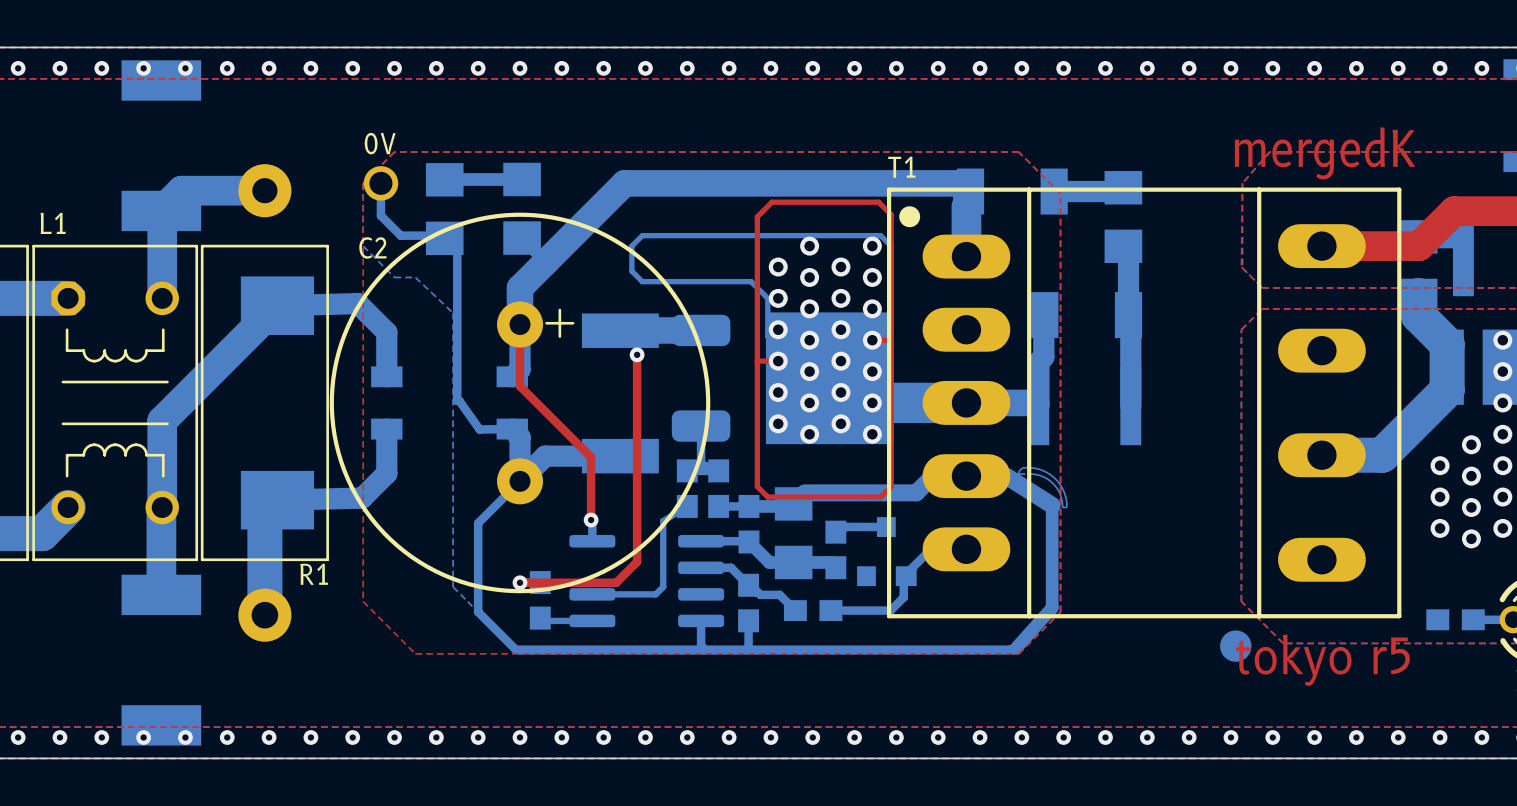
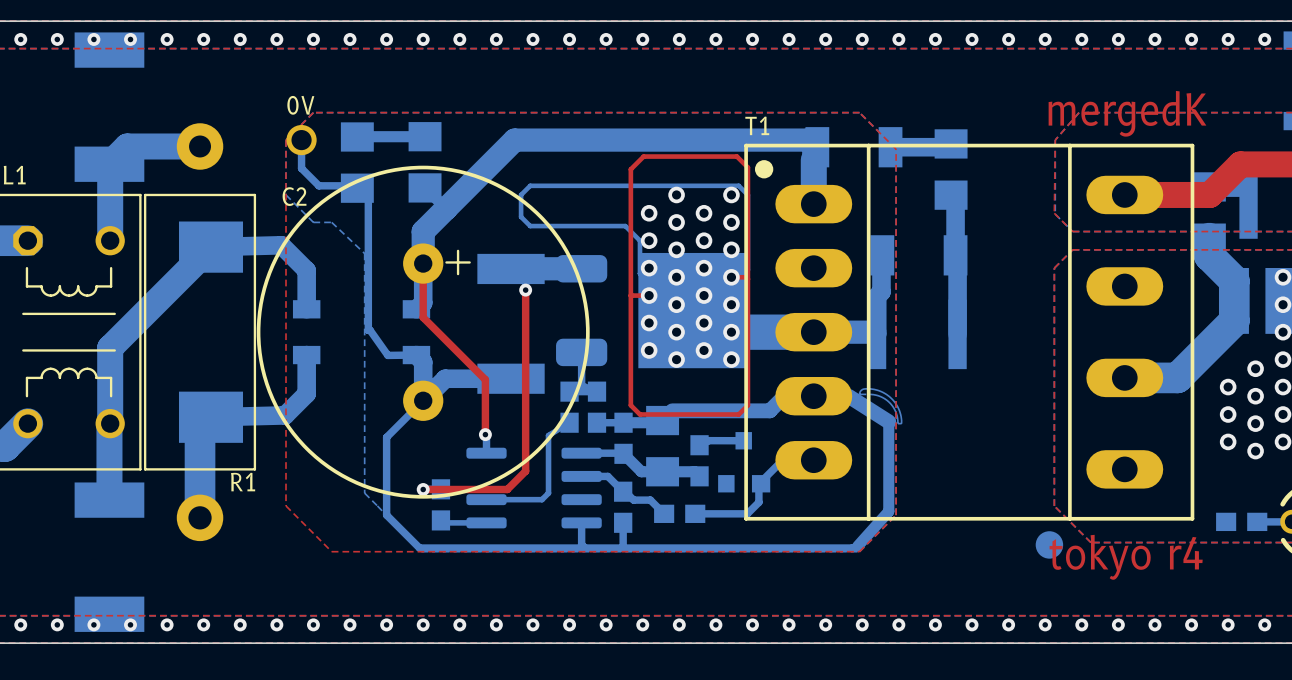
text: tokyo r5 (1322, 660) -> tokyo r4 (1126, 557)

